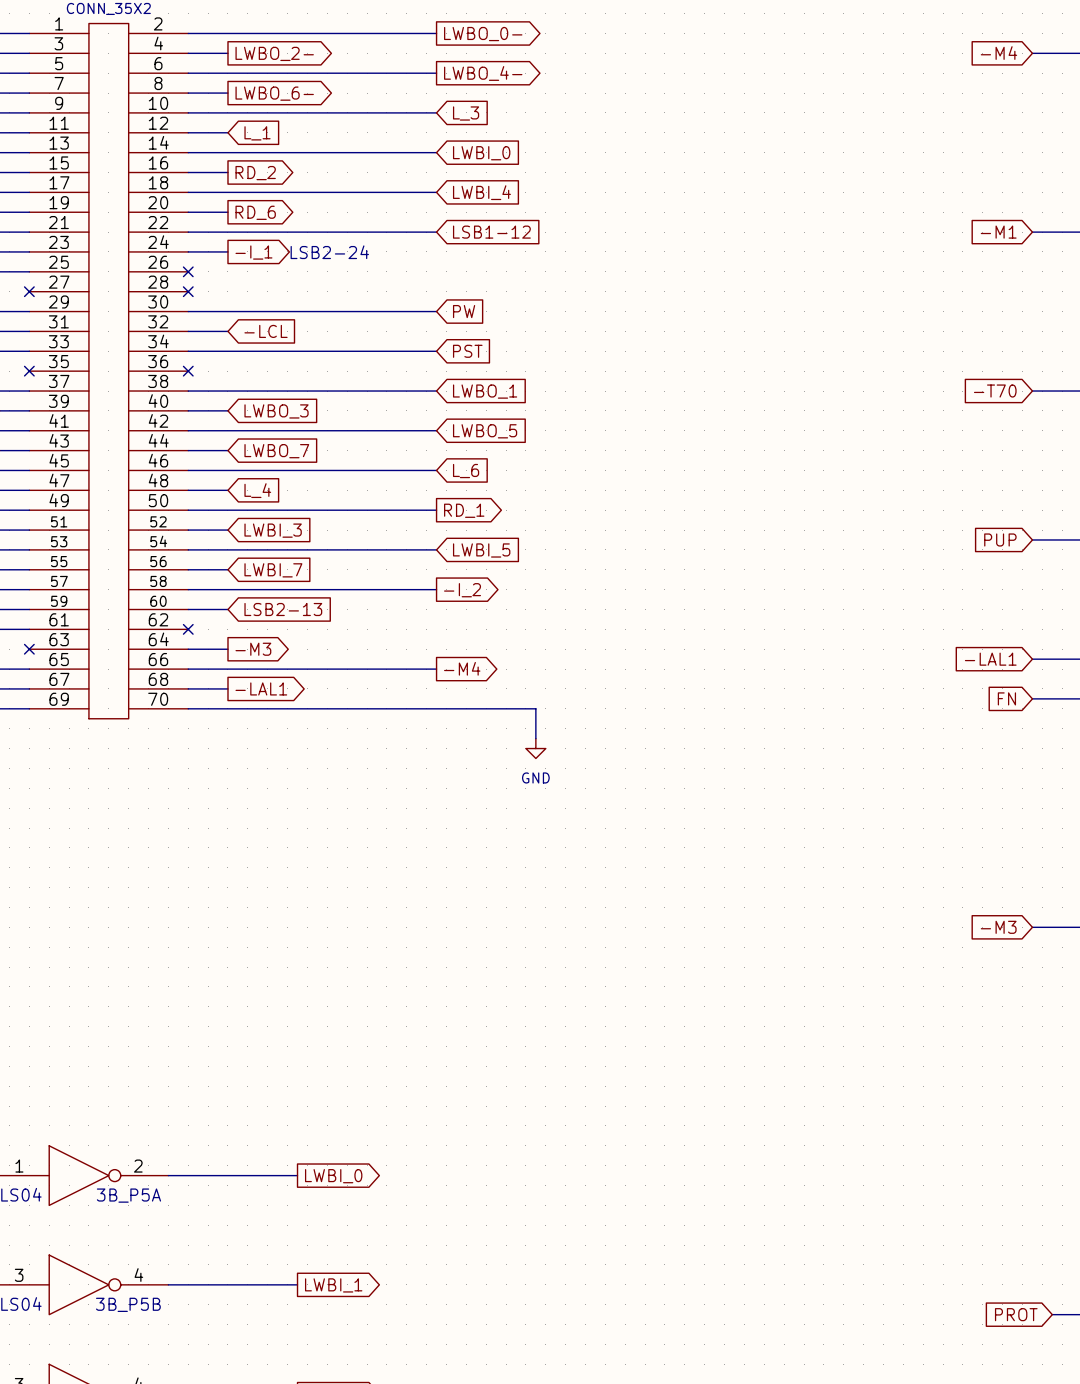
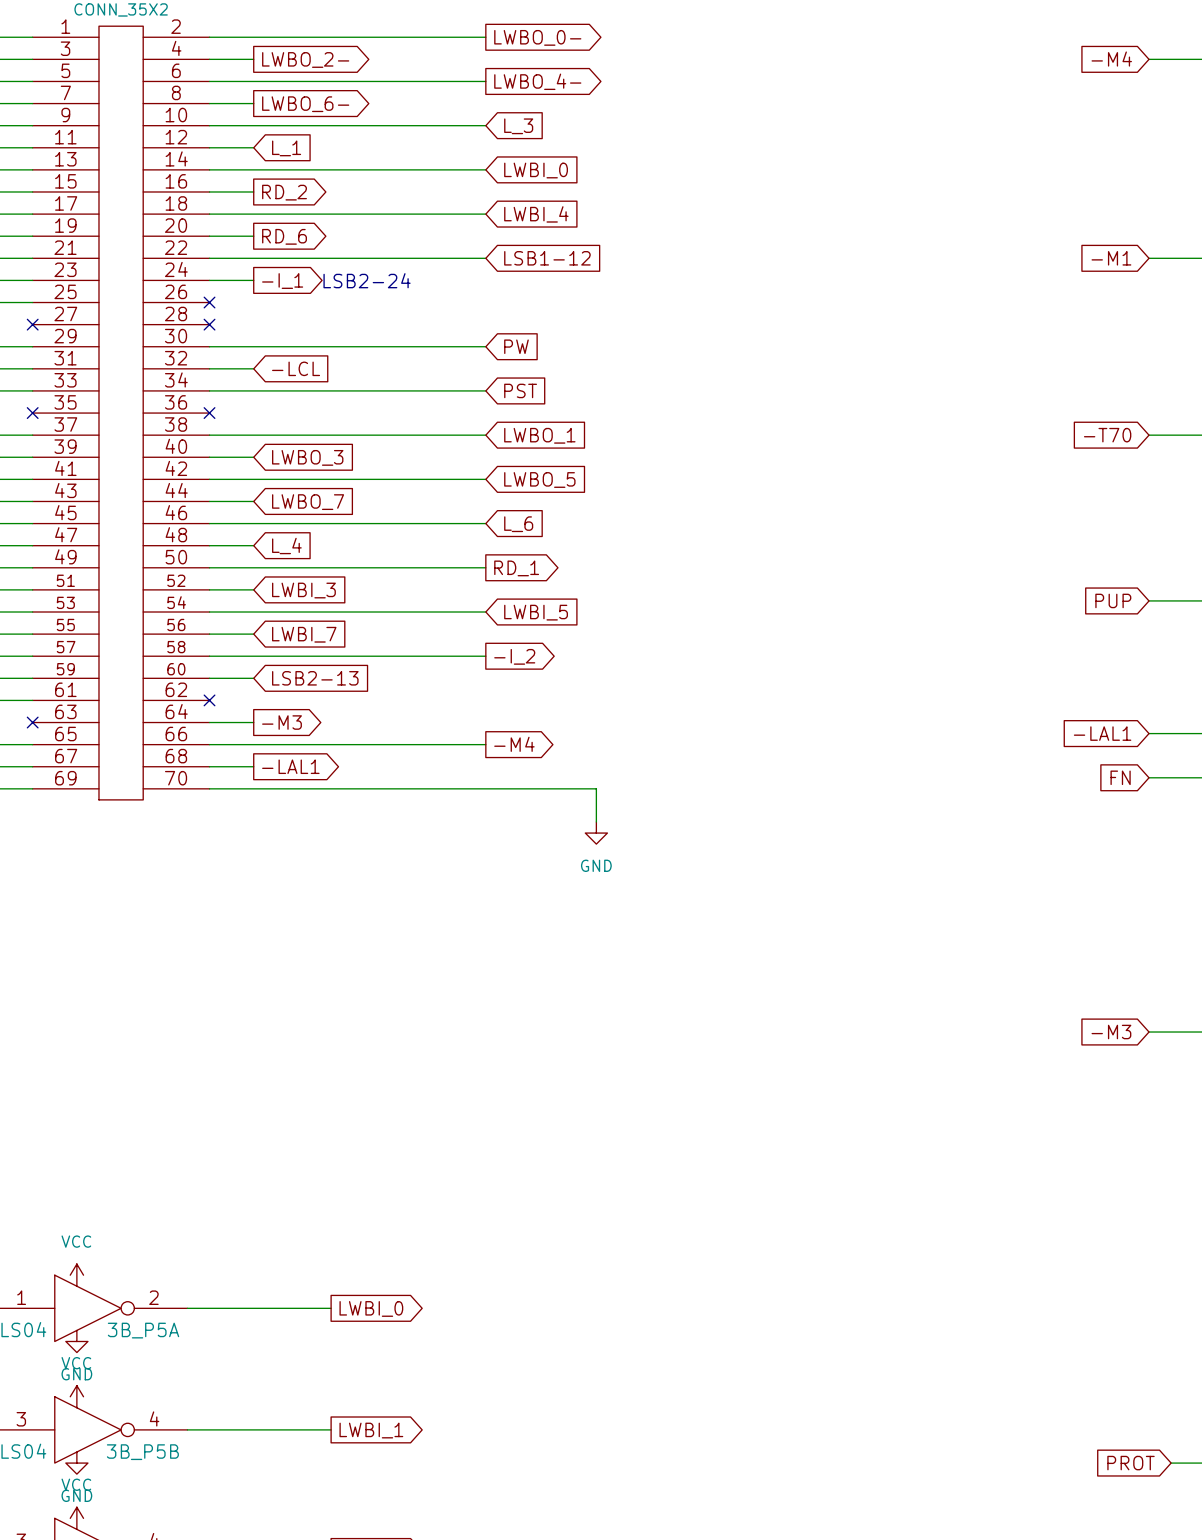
power symbol: none -> VCC (76, 1275)
power symbol: none -> GND (76, 1341)
power symbol: none -> VCC (76, 1396)
power symbol: none -> GND (76, 1463)
power symbol: none -> VCC (76, 1518)

